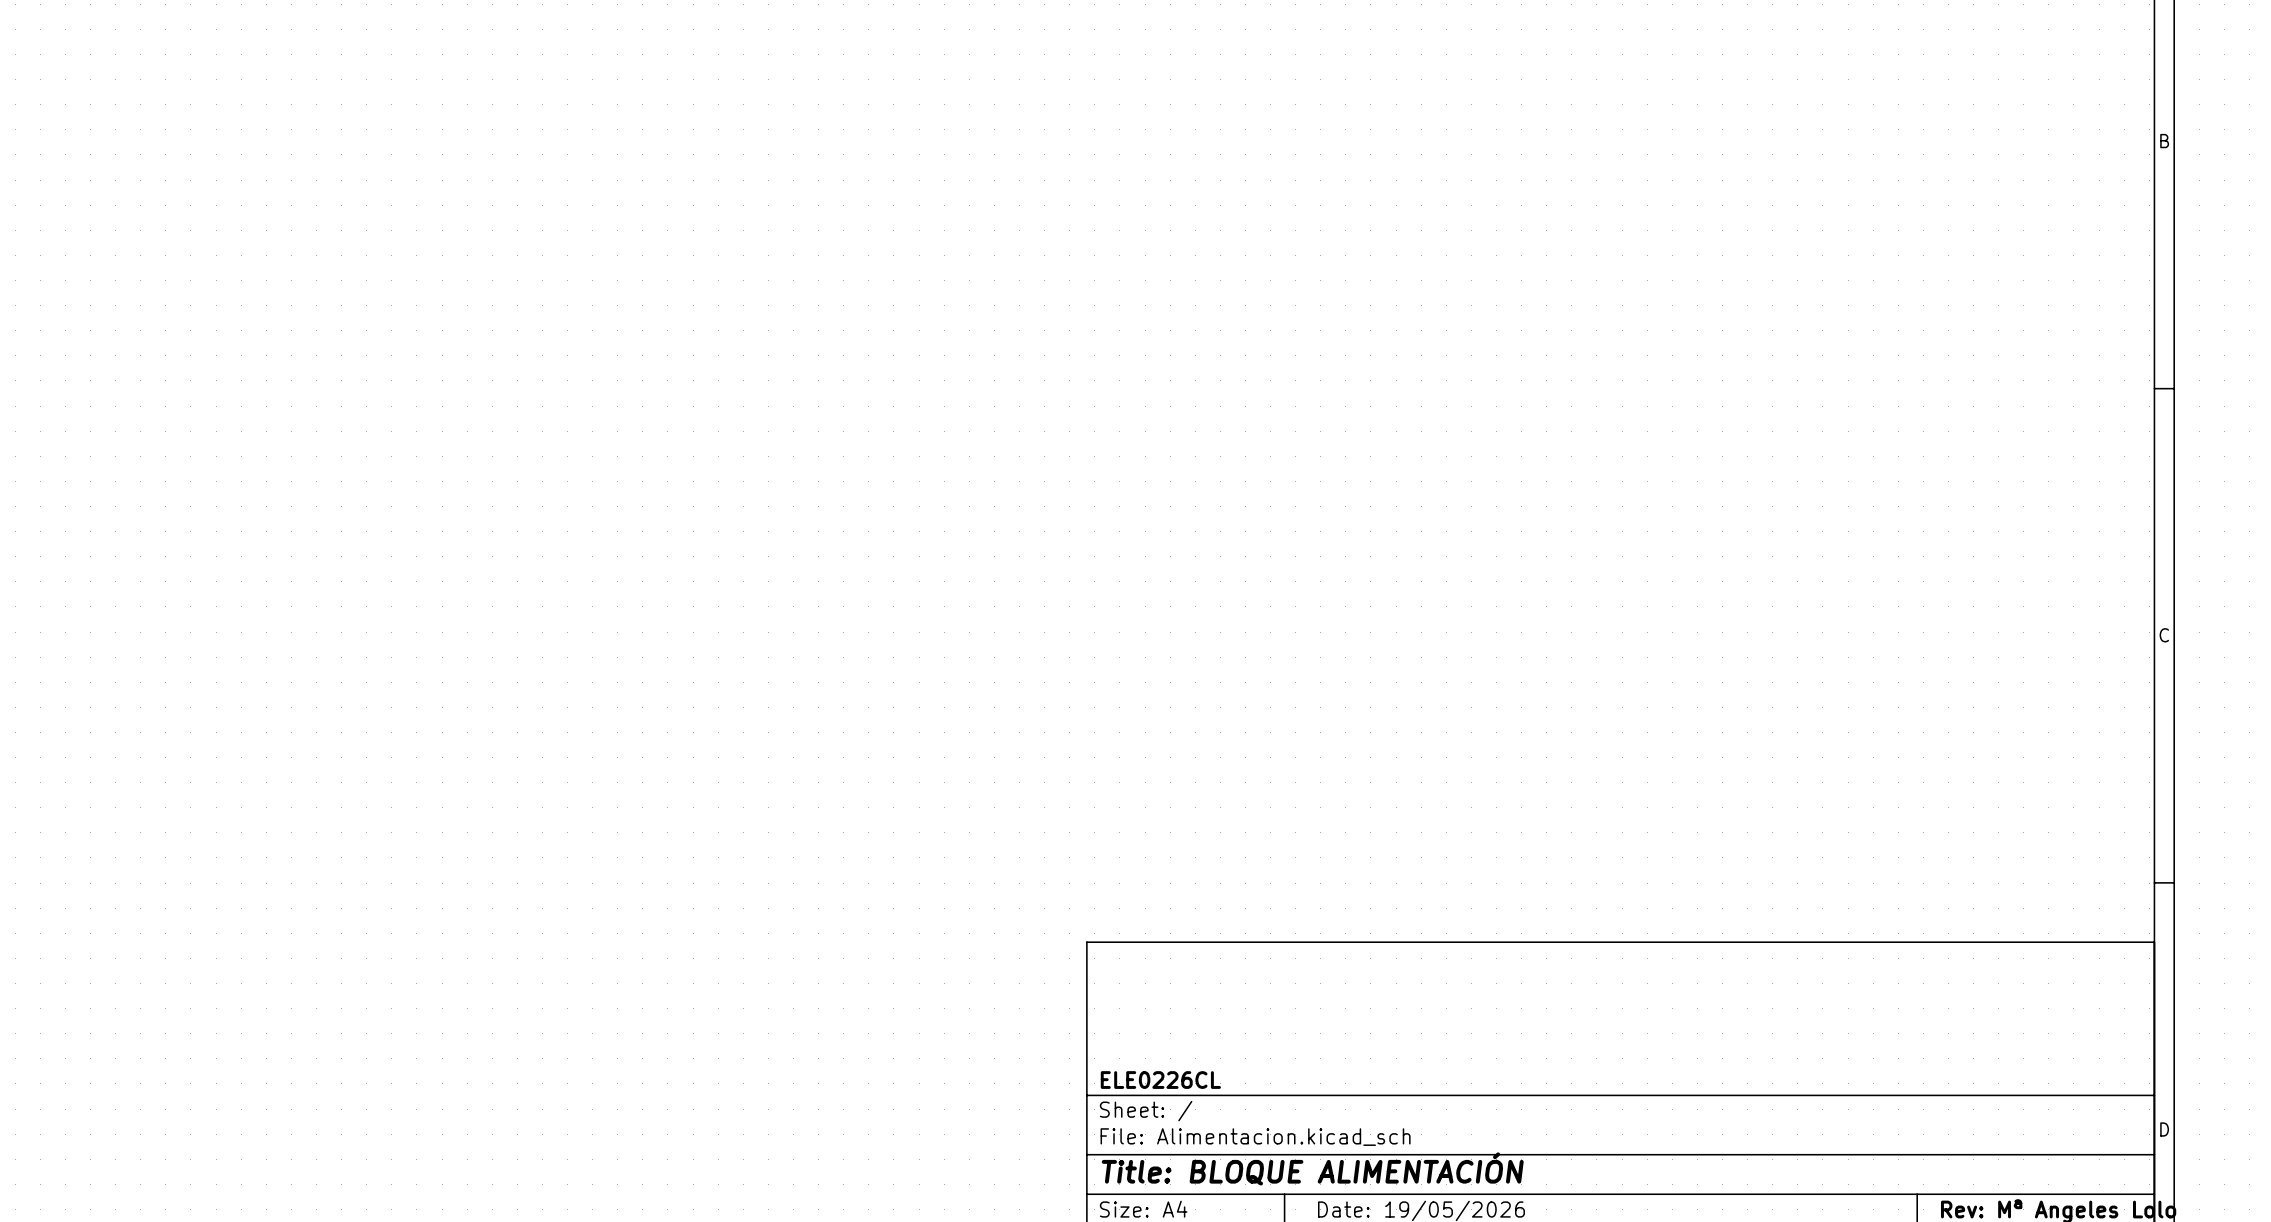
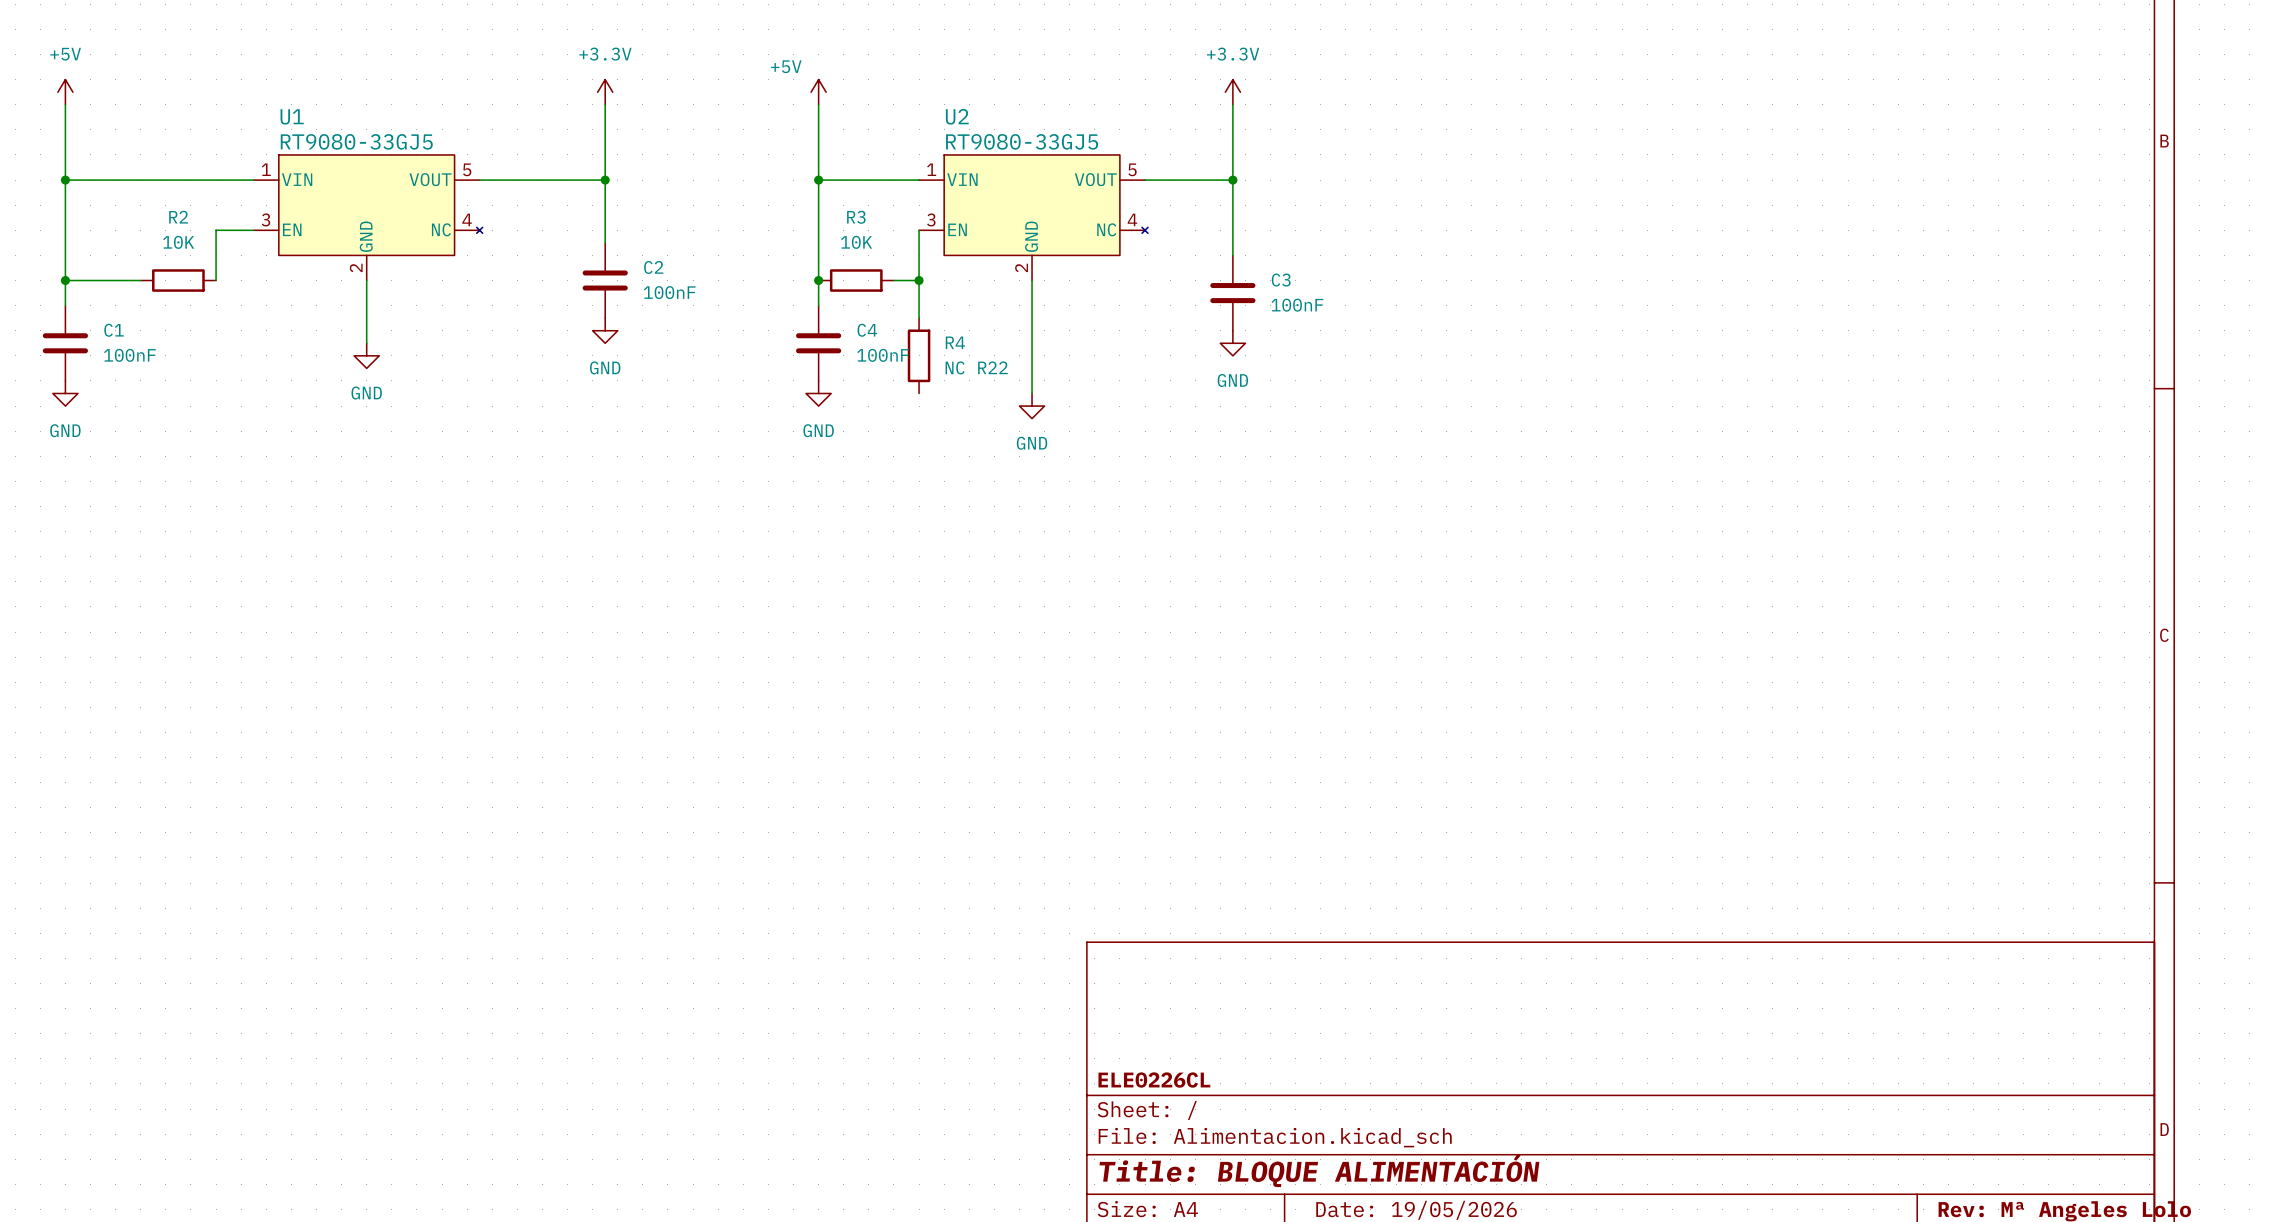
power symbol: none -> +5V (65, 92)
power symbol: none -> +3.3V (605, 92)
power symbol: none -> +5V (818, 92)
power symbol: none -> +3.3V (1232, 92)
wire: none -> (65, 104) (65, 305)
wire: none -> (605, 104) (605, 242)
wire: none -> (818, 104) (818, 305)
wire: none -> (1232, 104) (1232, 255)
wire: none -> (65, 180) (253, 180)
junction: none -> (65, 180)
wire: none -> (479, 180) (605, 180)
junction: none -> (605, 180)
wire: none -> (818, 180) (919, 180)
junction: none -> (818, 180)
wire: none -> (1145, 180) (1232, 180)
junction: none -> (1232, 180)
U1: none -> RT9080-33GJ5 (368, 217)
U2: none -> RT9080-33GJ5 (1033, 217)
wire: none -> (253, 230) (216, 230) (216, 280)
wire: none -> (919, 230) (919, 318)
wire: none -> (65, 280) (140, 280)
junction: none -> (65, 280)
R2: none -> 10K (178, 280)
wire: none -> (366, 280) (366, 343)
C2: none -> 100nF (605, 280)
junction: none -> (818, 280)
R3: none -> 10K (856, 280)
wire: none -> (893, 280) (919, 280)
junction: none -> (919, 280)
wire: none -> (1032, 280) (1032, 393)
C3: none -> 100nF (1232, 293)
power symbol: none -> GND (605, 330)
C1: none -> 100nF (65, 343)
C4: none -> 100nF (818, 343)
power symbol: none -> GND (1232, 343)
power symbol: none -> GND (366, 355)
R4: none -> NC R22 (919, 355)
power symbol: none -> GND (65, 393)
power symbol: none -> GND (818, 393)
power symbol: none -> GND (1032, 406)

